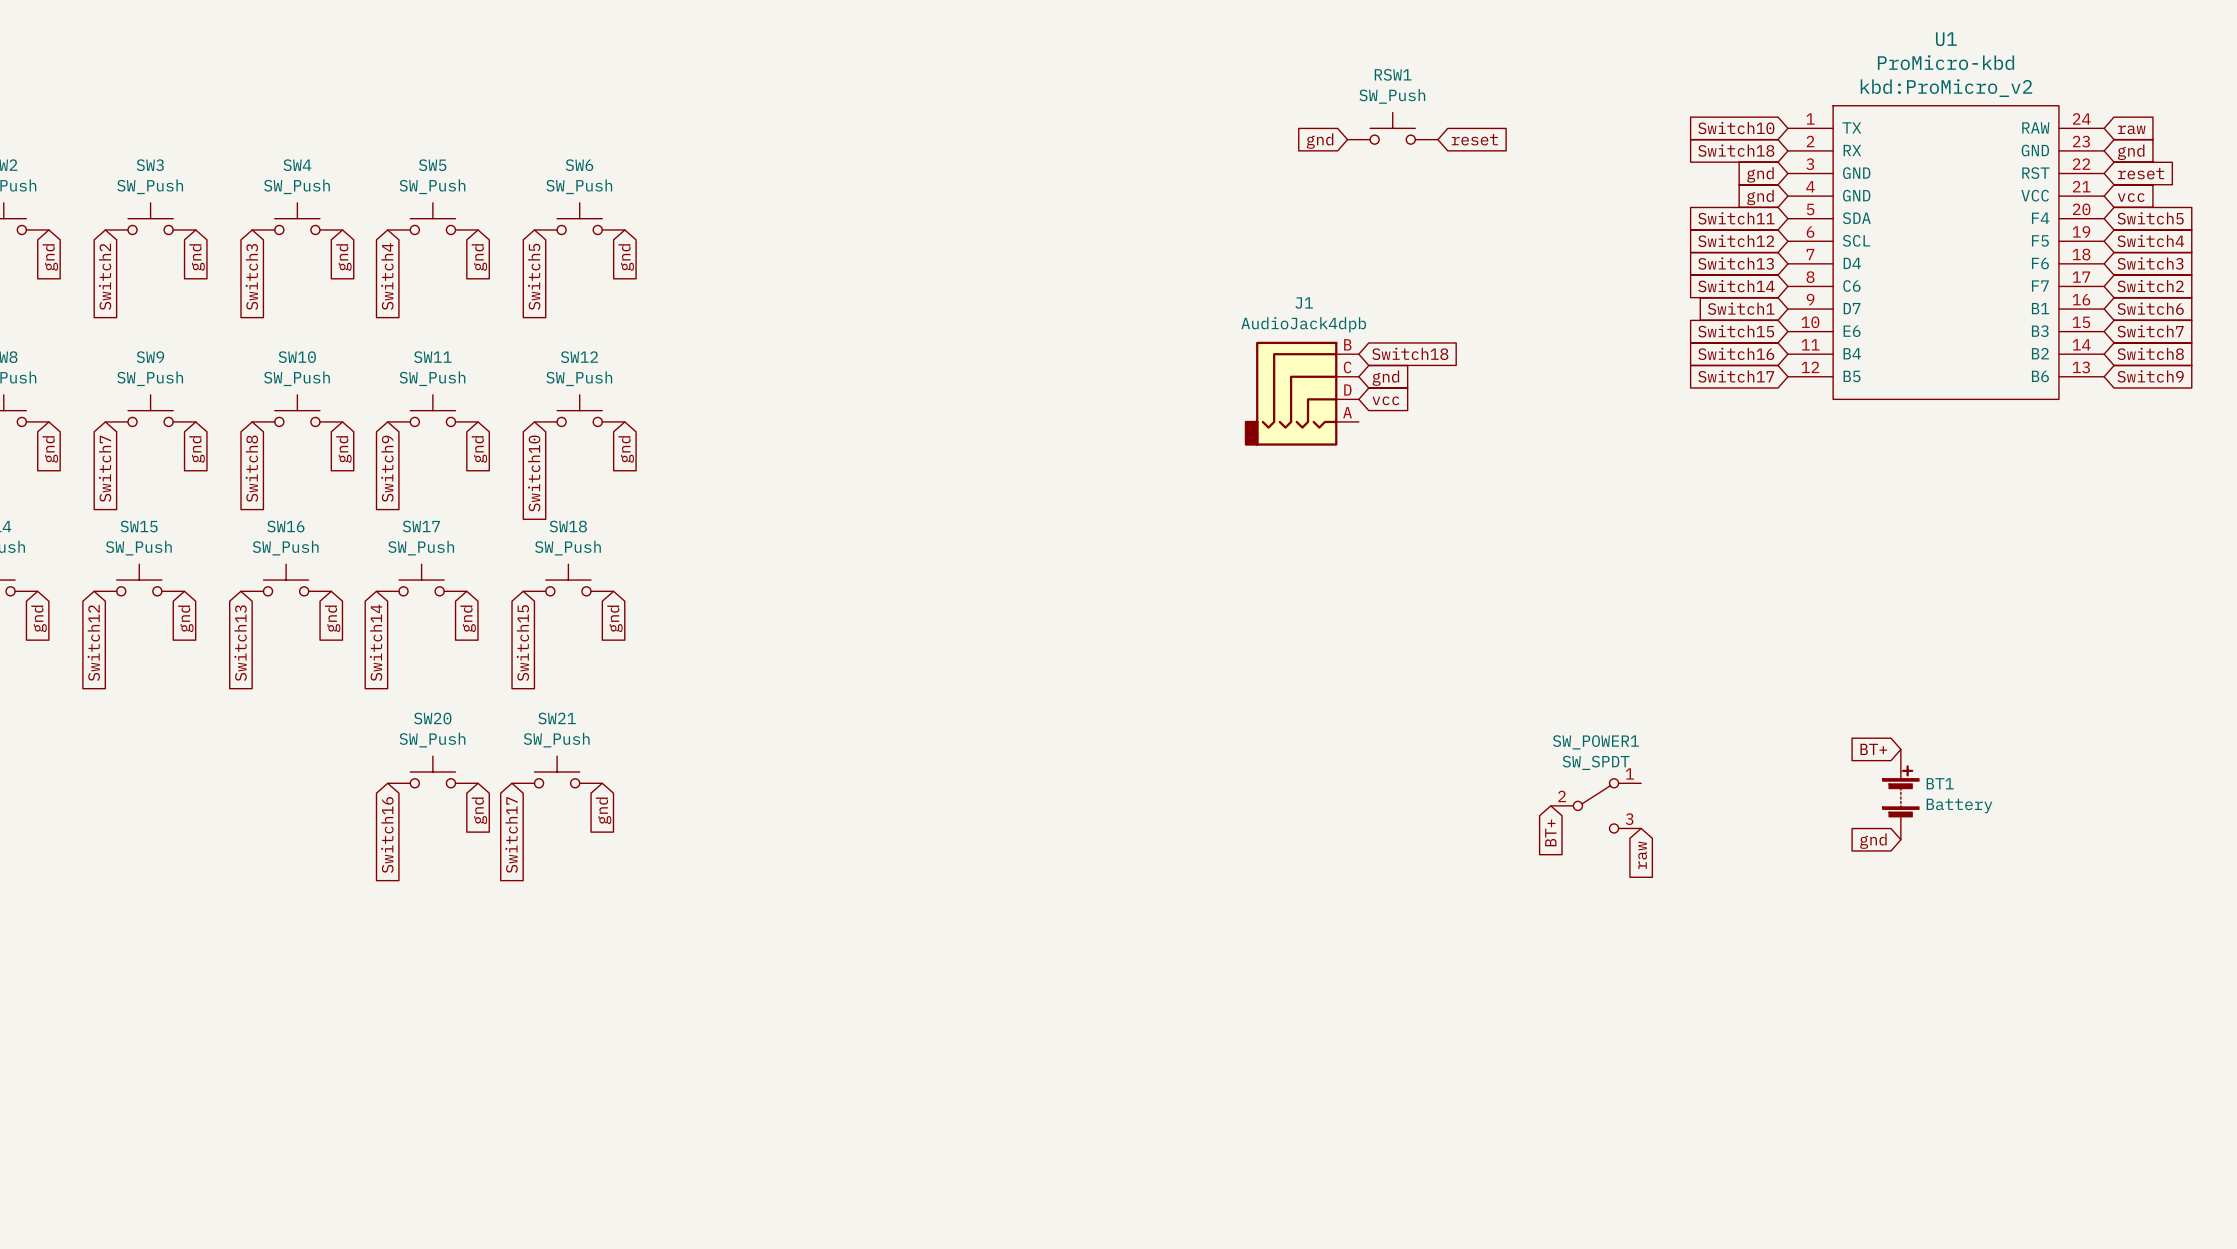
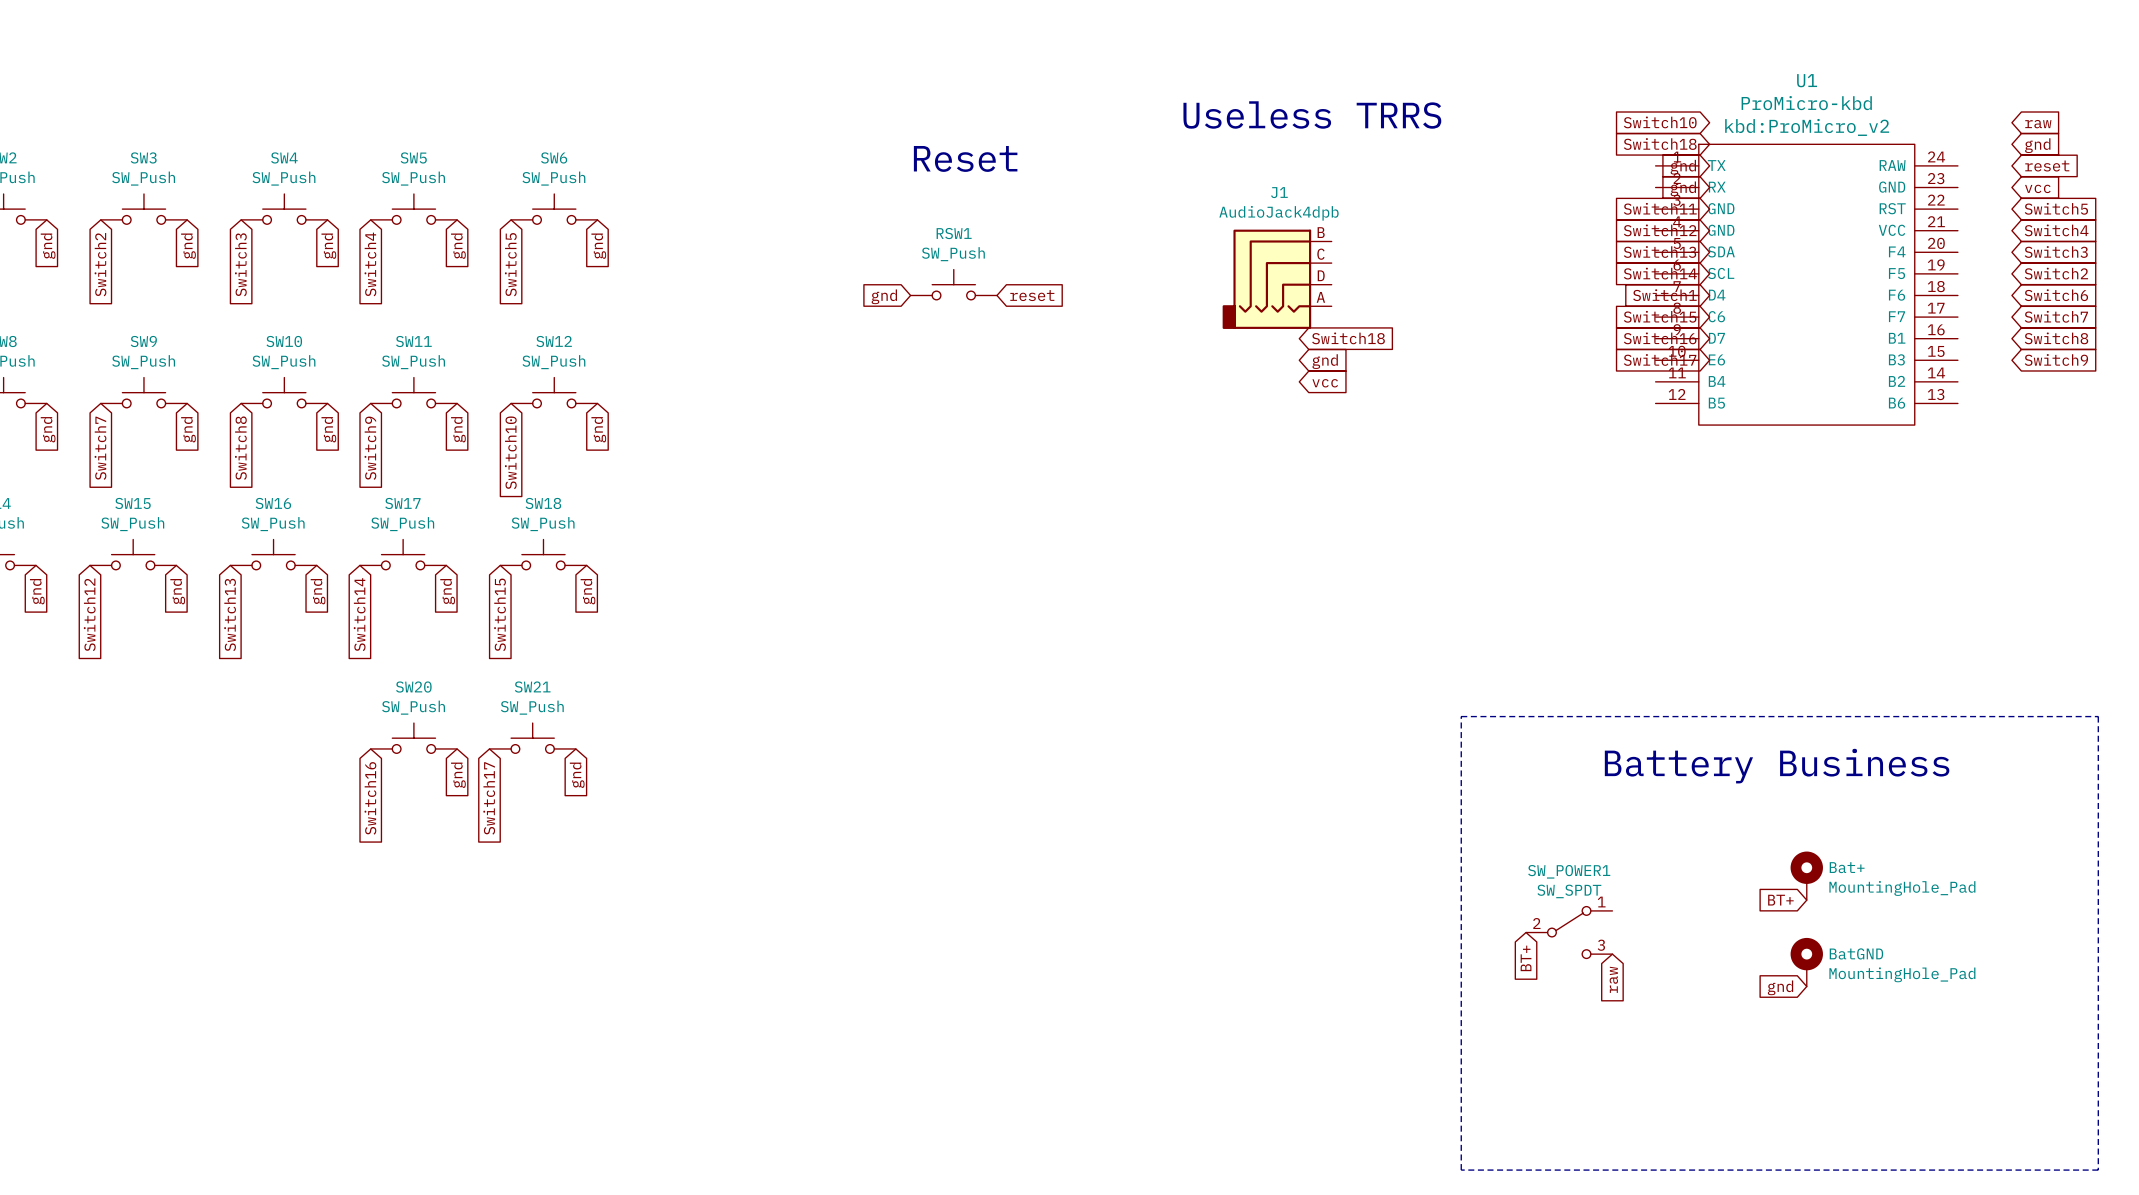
text: none -> Useless TRRS (1312, 114)
RSW1 position: (1392, 128) -> (953, 284)
global label: reset (1474, 139) -> none
global label: gnd (1320, 141) -> none
text: none -> Reset (965, 158)
U1 position: (1946, 252) -> (1806, 284)
global label: none -> reset (1032, 295)
global label: none -> gnd (884, 296)
J1 position: (1301, 393) -> (1277, 279)
line: none -> (1461, 716) (2098, 716) (2098, 1170) (1461, 1170) (1461, 716)
global label: BT+ (1873, 749) -> none
BT1: Battery (1900, 794) -> none
text: none -> Battery Business (1777, 766)
SW_POWER1 position: (1595, 805) -> (1569, 932)
global label position: BT+ (1550, 832) -> BT+ (1526, 958)
global label position: gnd (1873, 841) -> gnd (1780, 987)
global label position: raw (1642, 855) -> raw (1613, 979)
Bat+: none -> MountingHole_Pad (1806, 875)
global label: none -> BT+ (1780, 900)
BatGND: none -> MountingHole_Pad (1806, 962)

